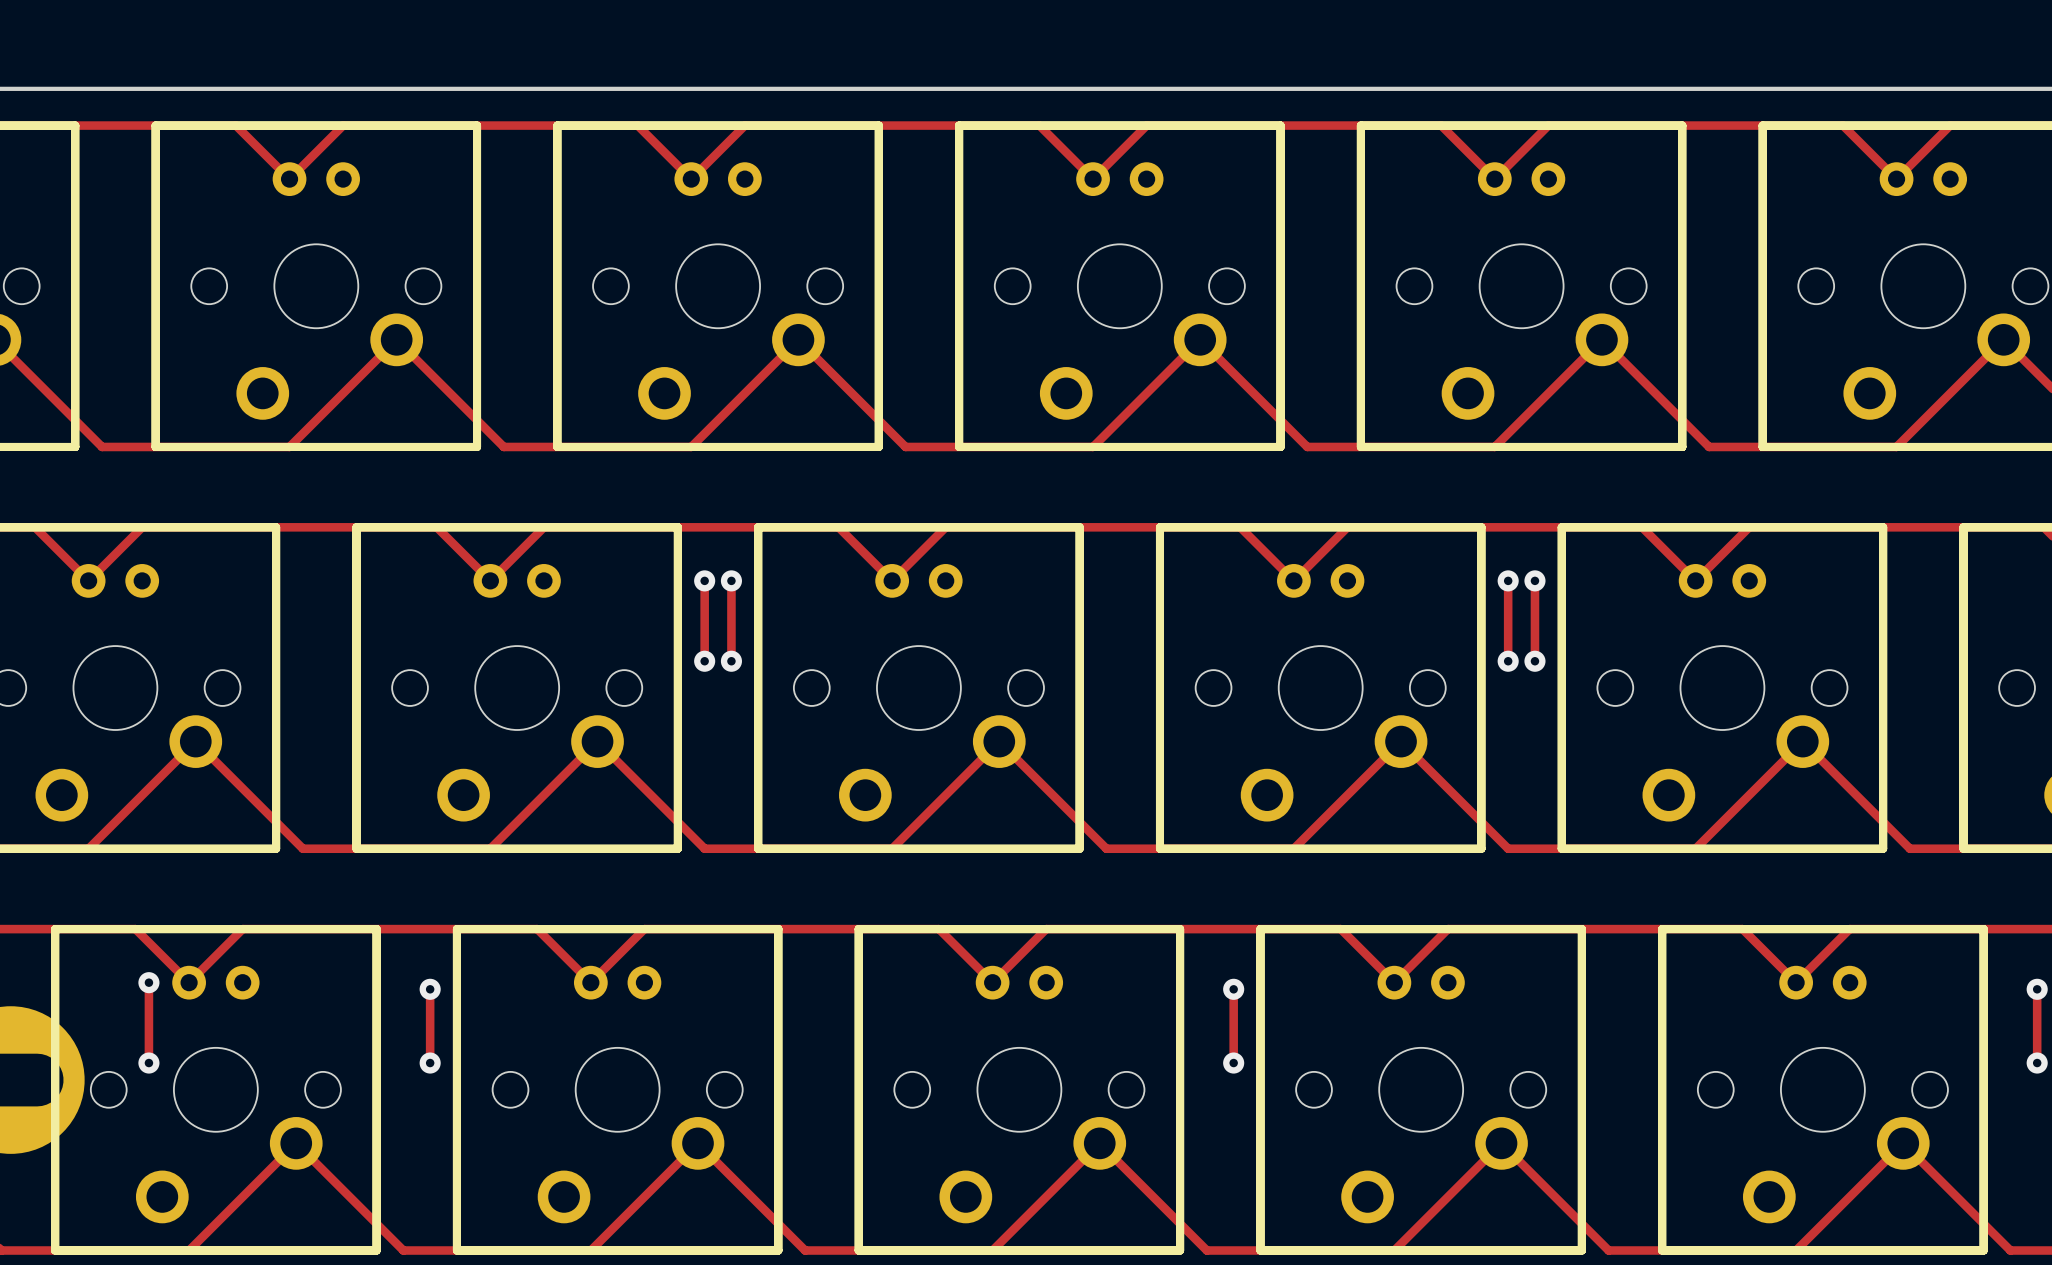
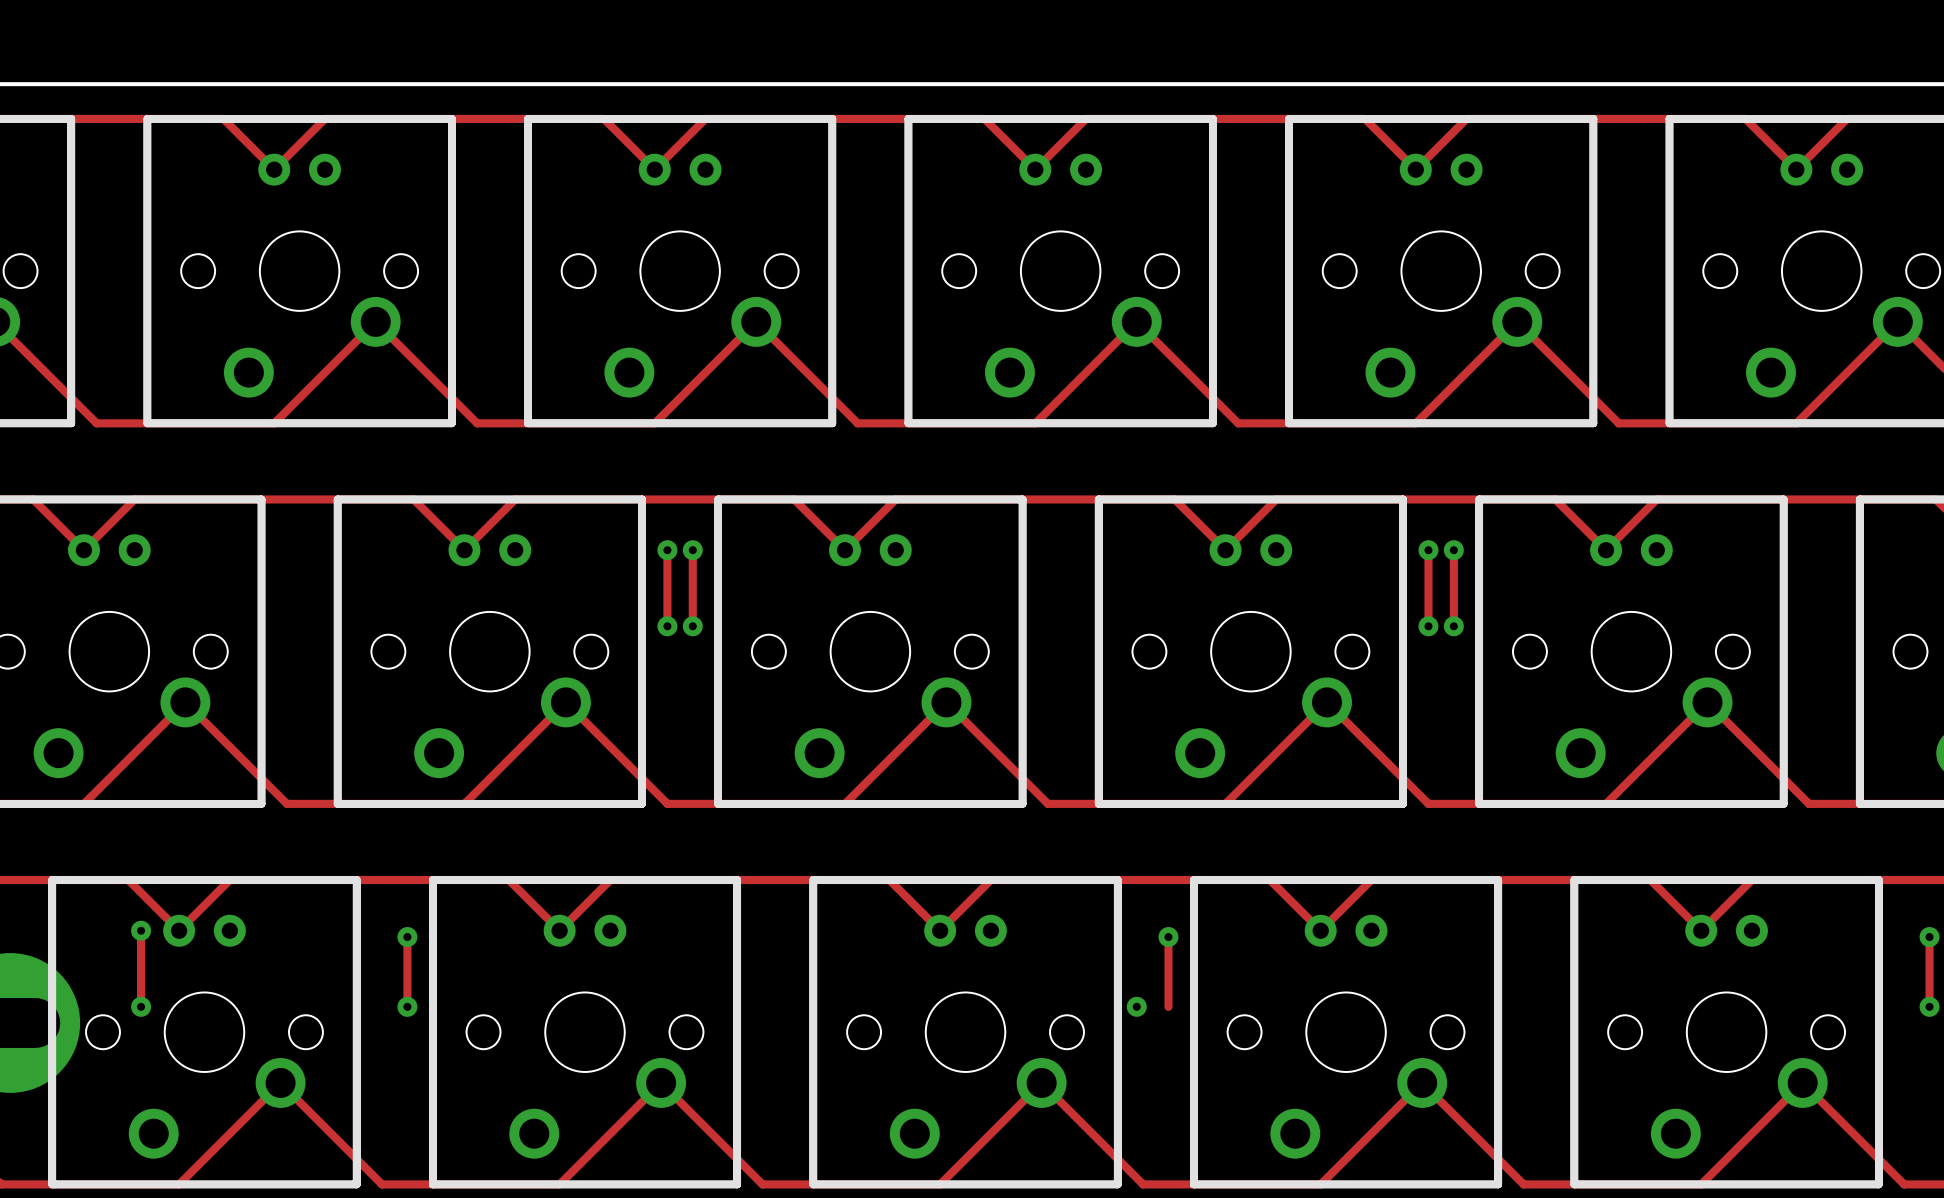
via position: (1233, 1063) -> (1136, 1006)

